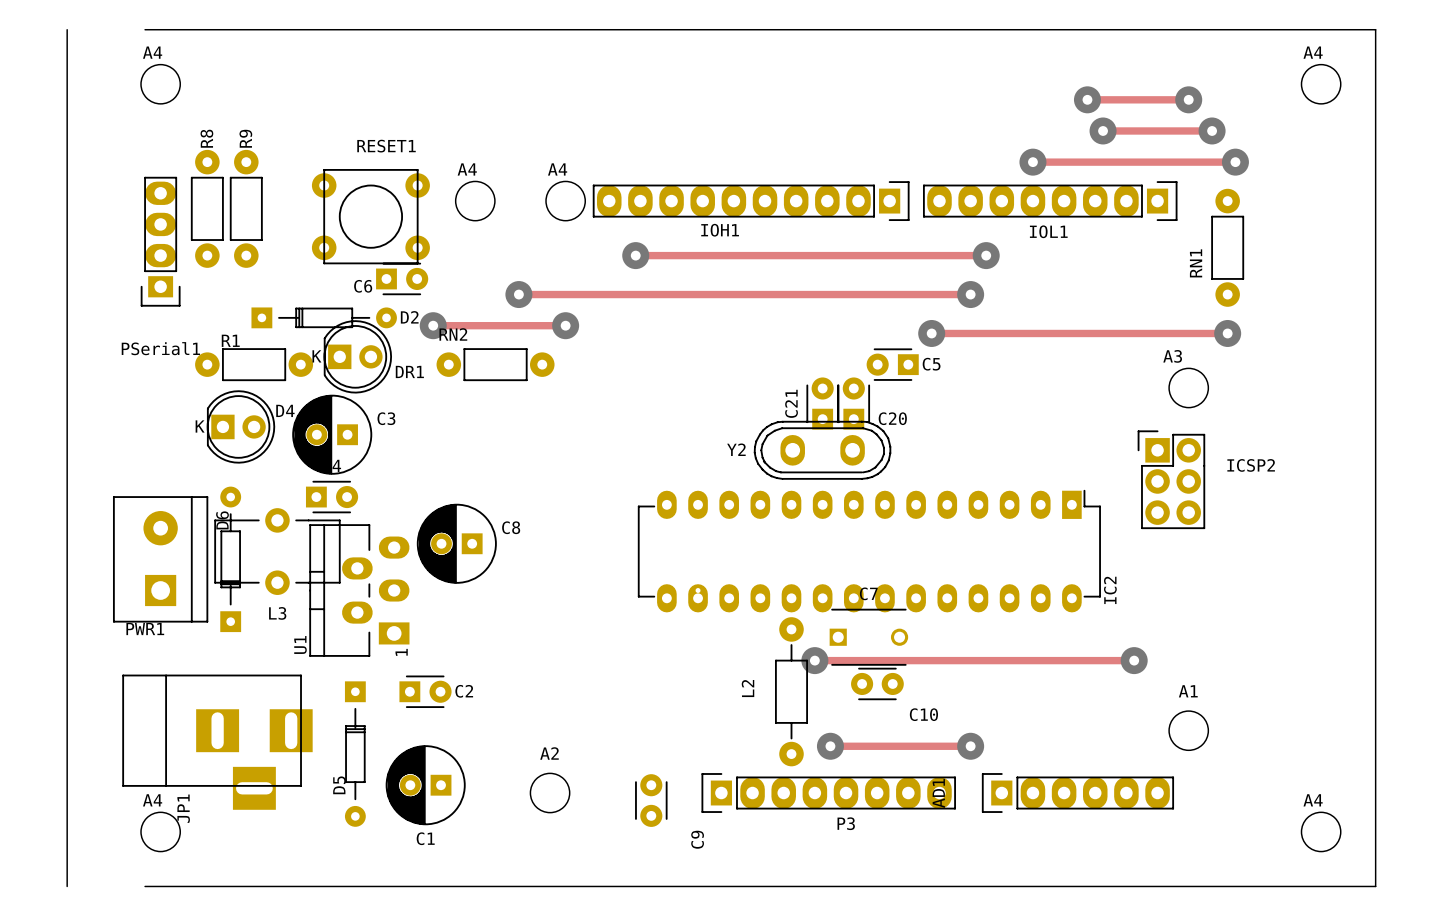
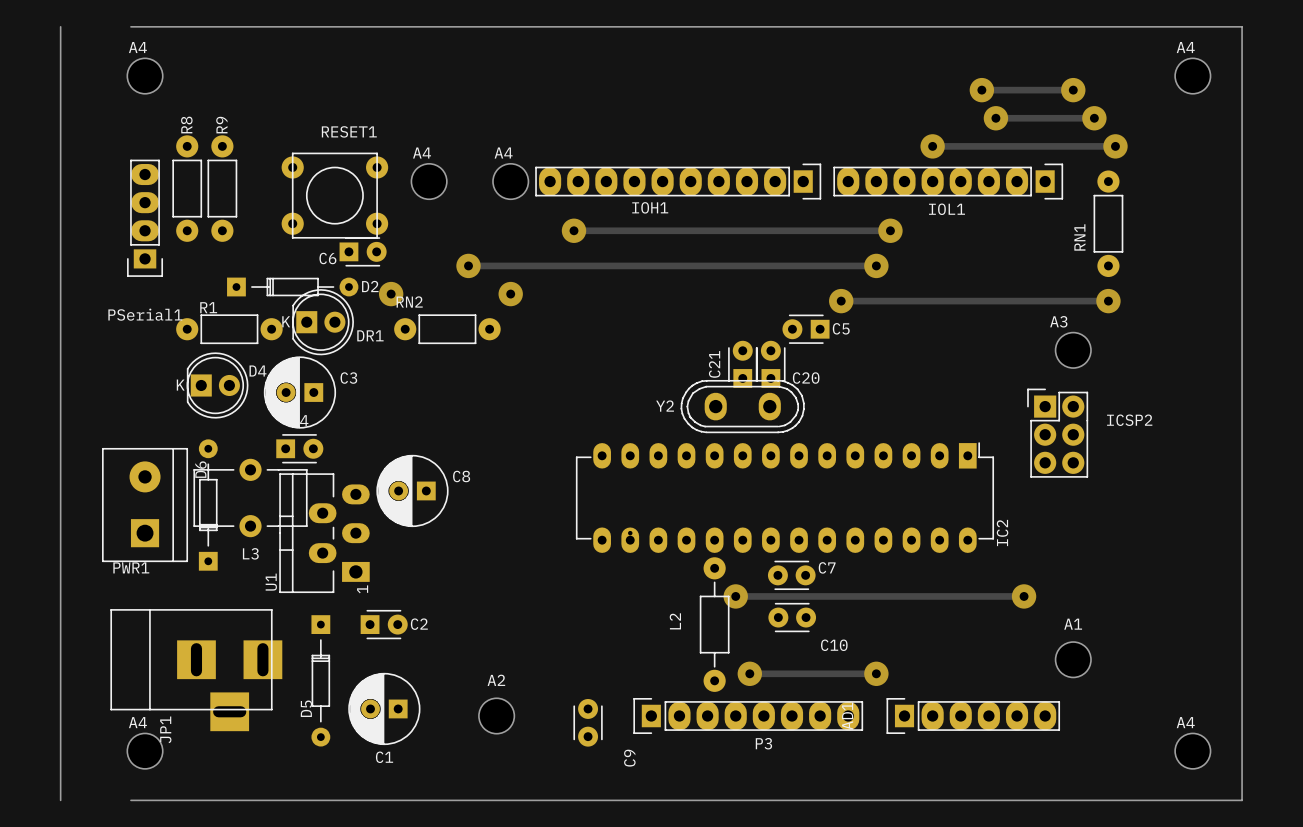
track: (433, 325) (565, 325) -> none
C7 name position: C7 (868, 593) -> C7 (827, 567)
C7 footprint: [829, 608, 909, 666] -> [767, 560, 816, 591]

